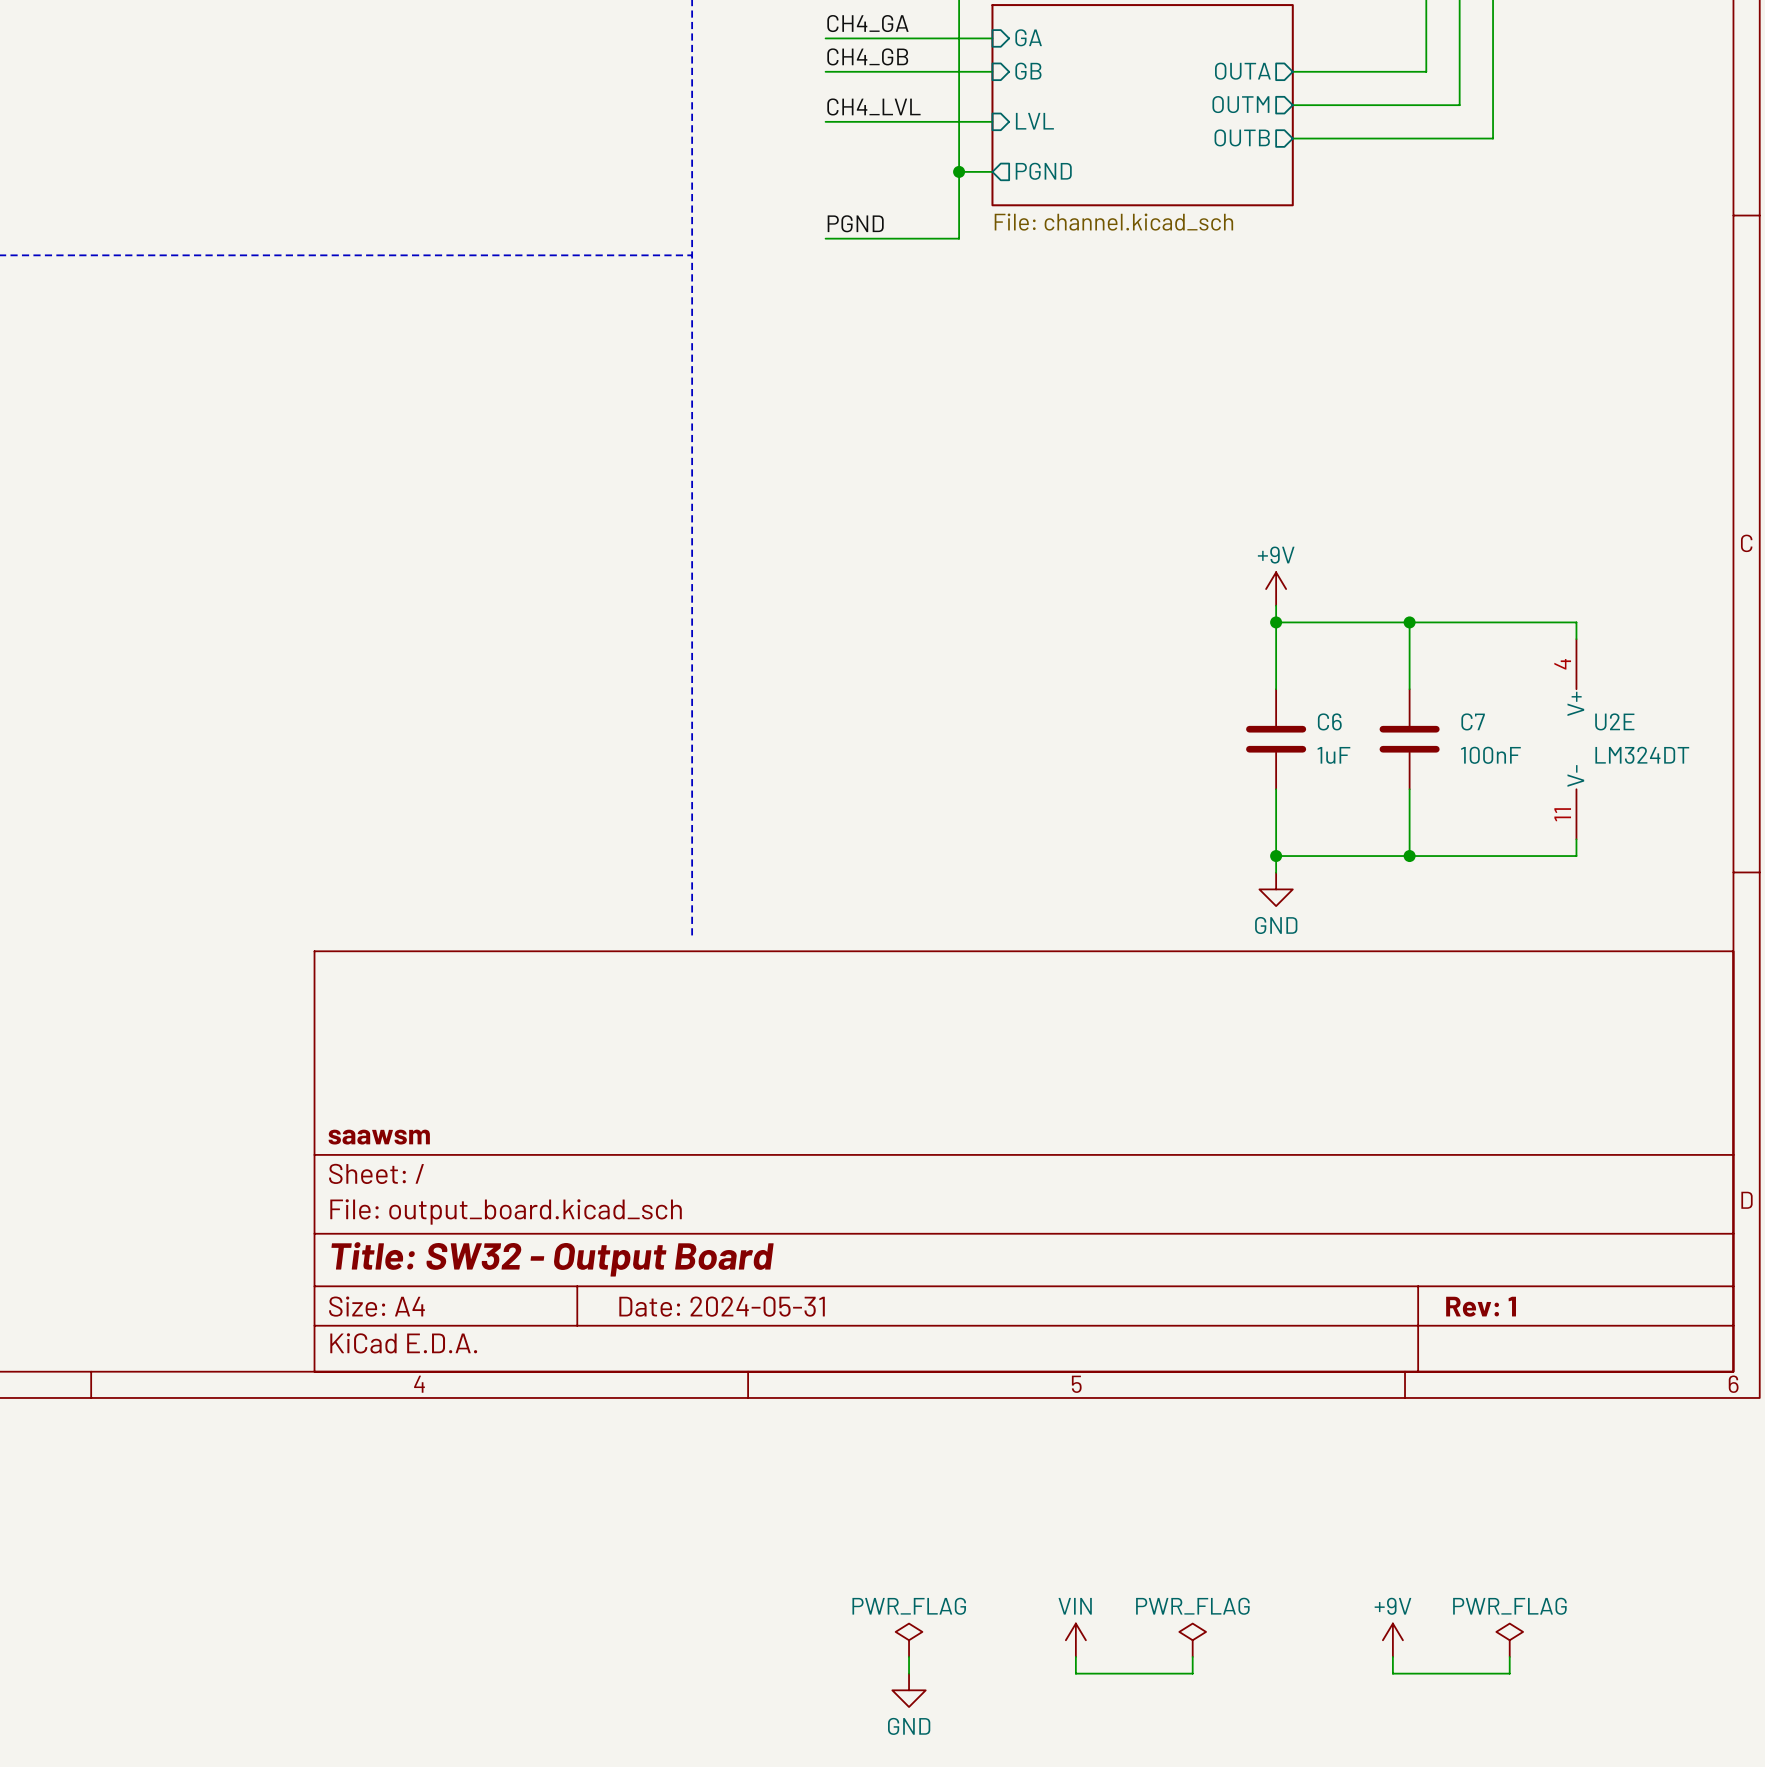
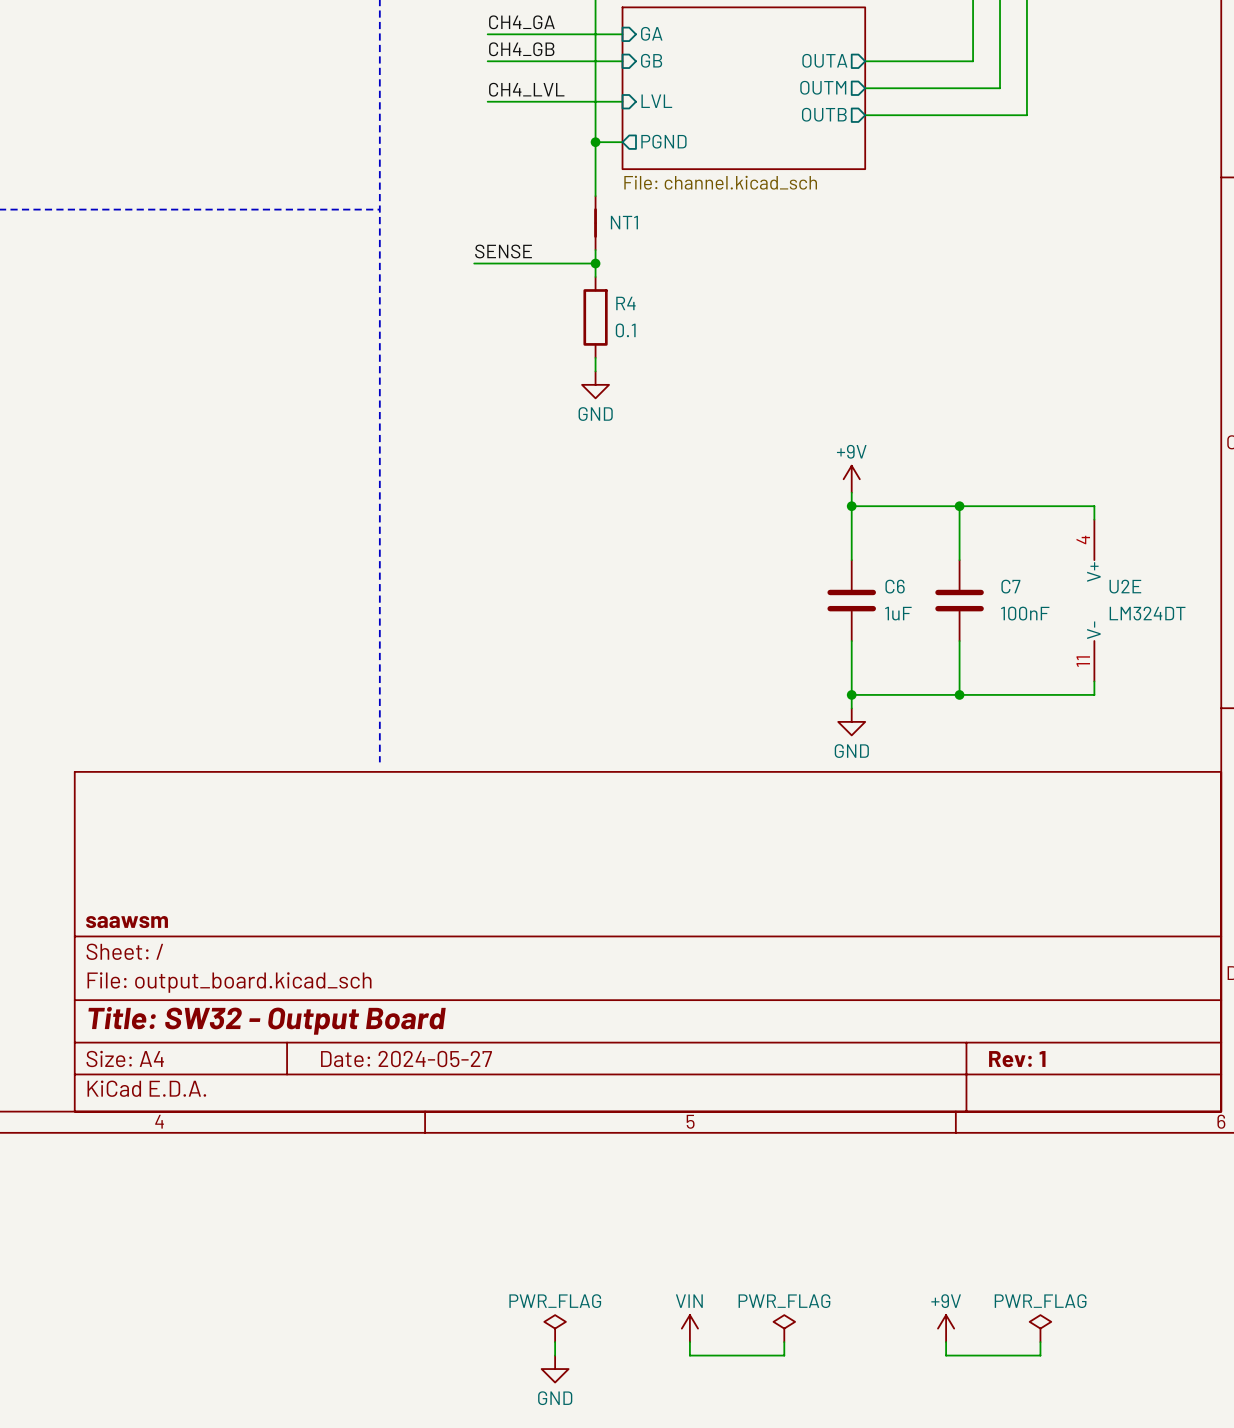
label: PGND (855, 223) -> none
wire: (825, 238) (959, 238) -> none
NT1: none -> (595, 223)
wire: none -> (595, 250) (595, 277)
label: none -> SENSE (503, 251)
wire: none -> (474, 263) (595, 263)
junction: none -> (595, 263)
R4: none -> 0.1 (595, 317)
wire: none -> (595, 357) (595, 371)
power symbol: none -> GND (595, 384)
title block: Date: 2024-05-31 (722, 1306) -> Date: 2024-05-27 (406, 1059)

